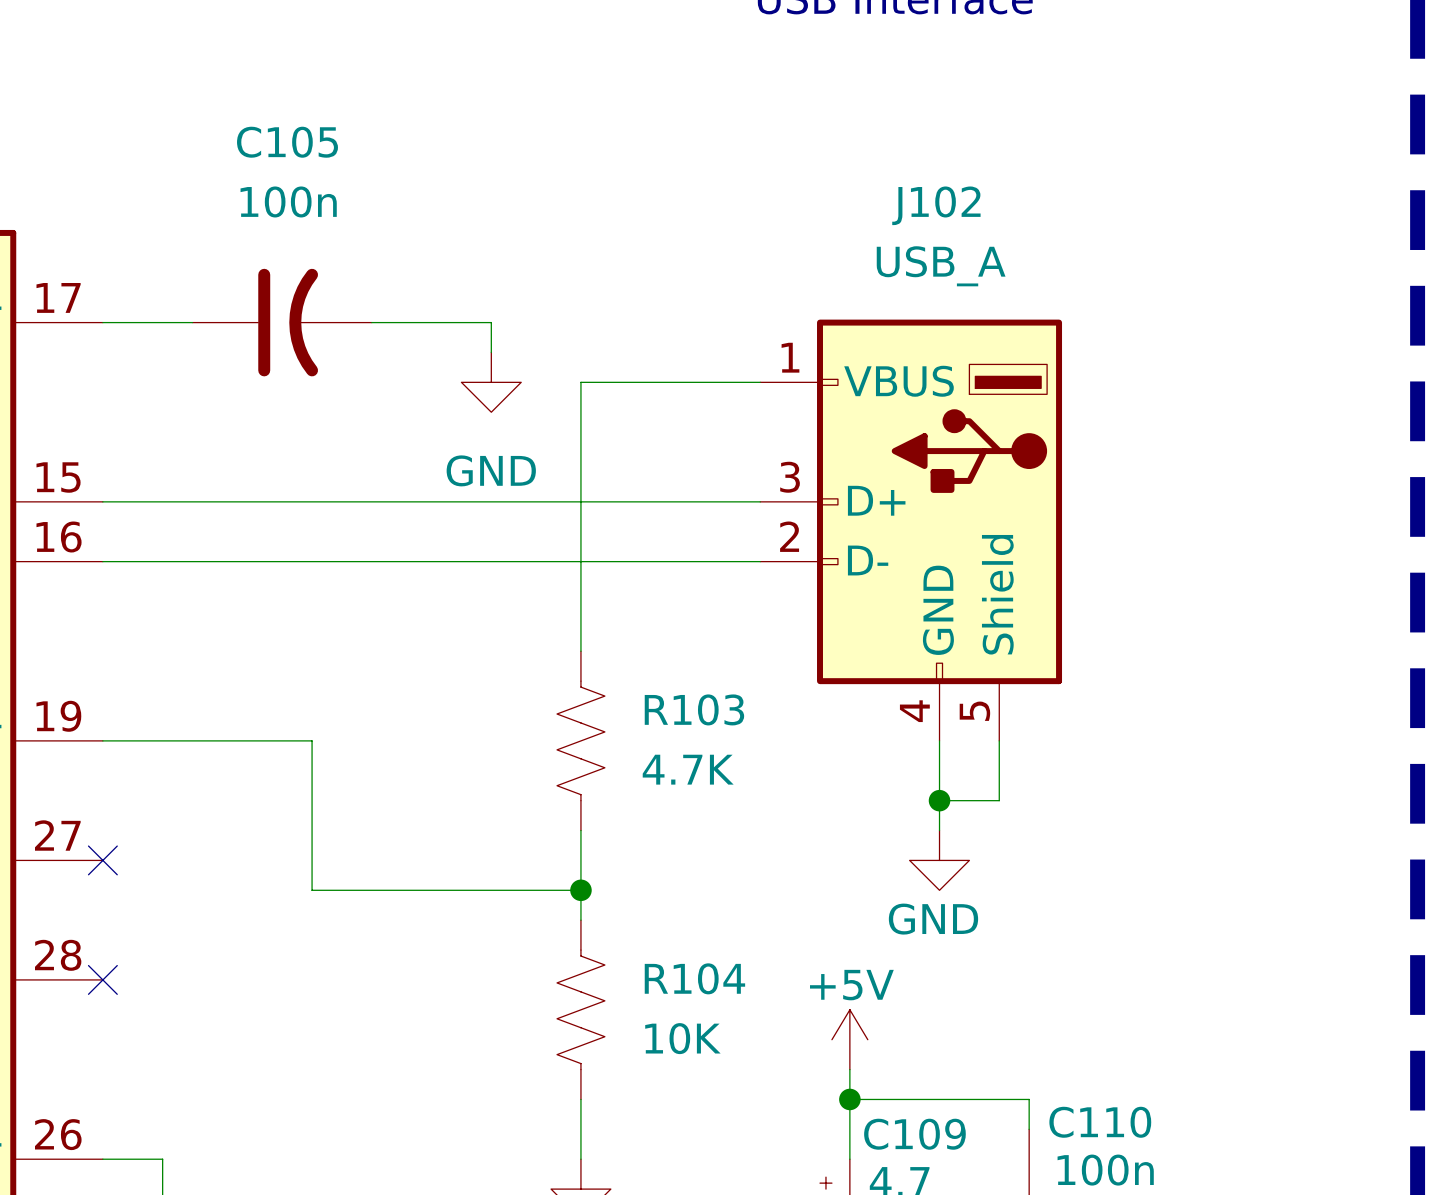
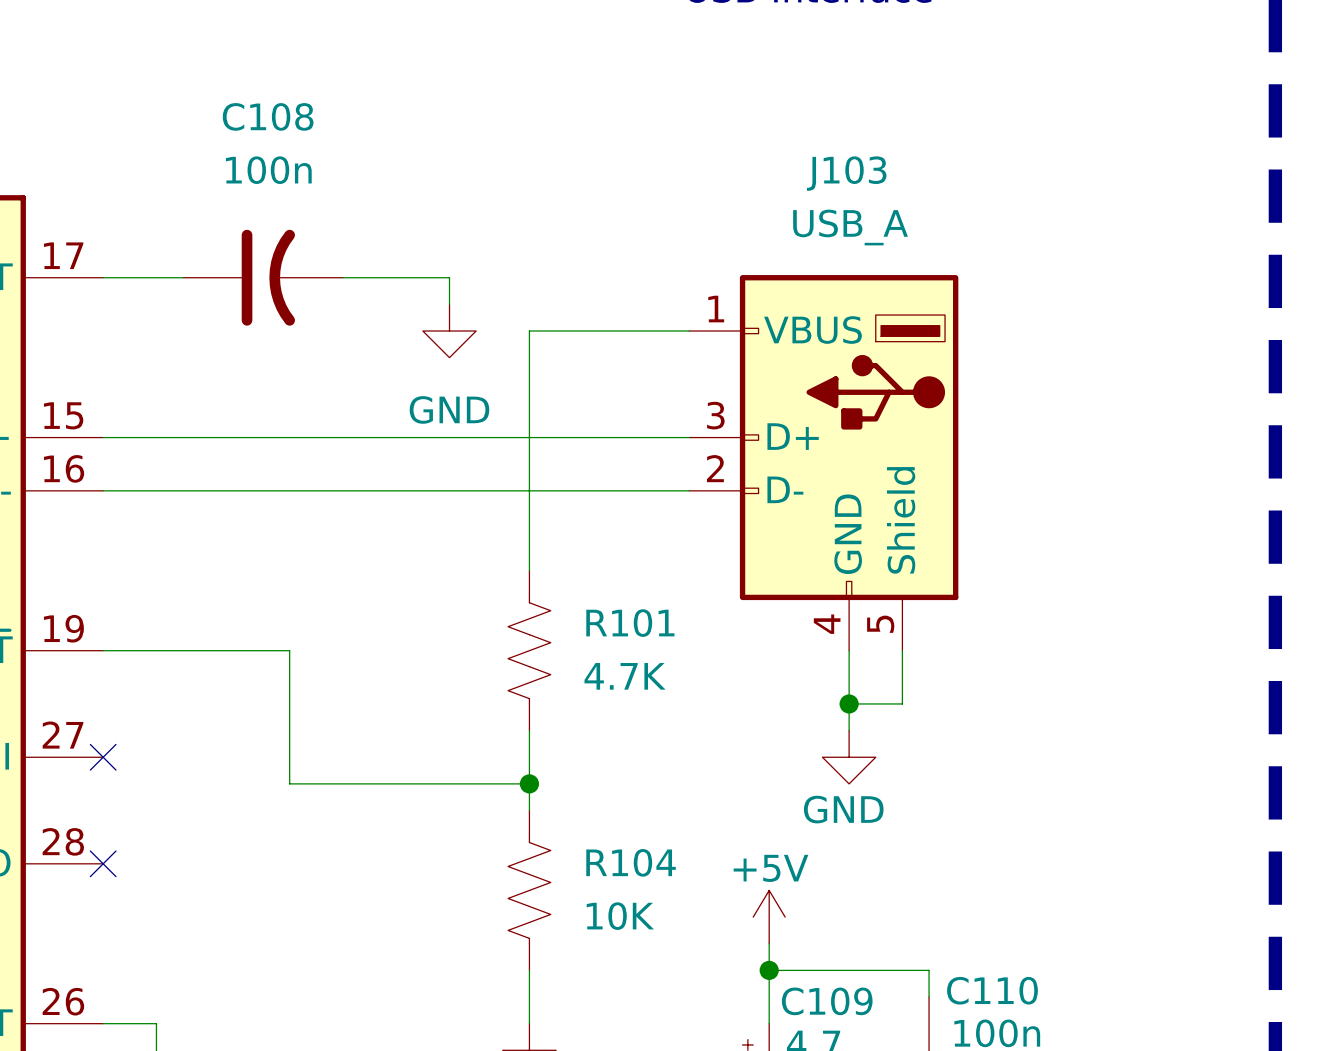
C105 name: C105 (287, 142) -> C108 (268, 116)
J102 name: J102 (936, 205) -> J103 (846, 173)
R103 name: R103 (694, 709) -> R101 (630, 623)

